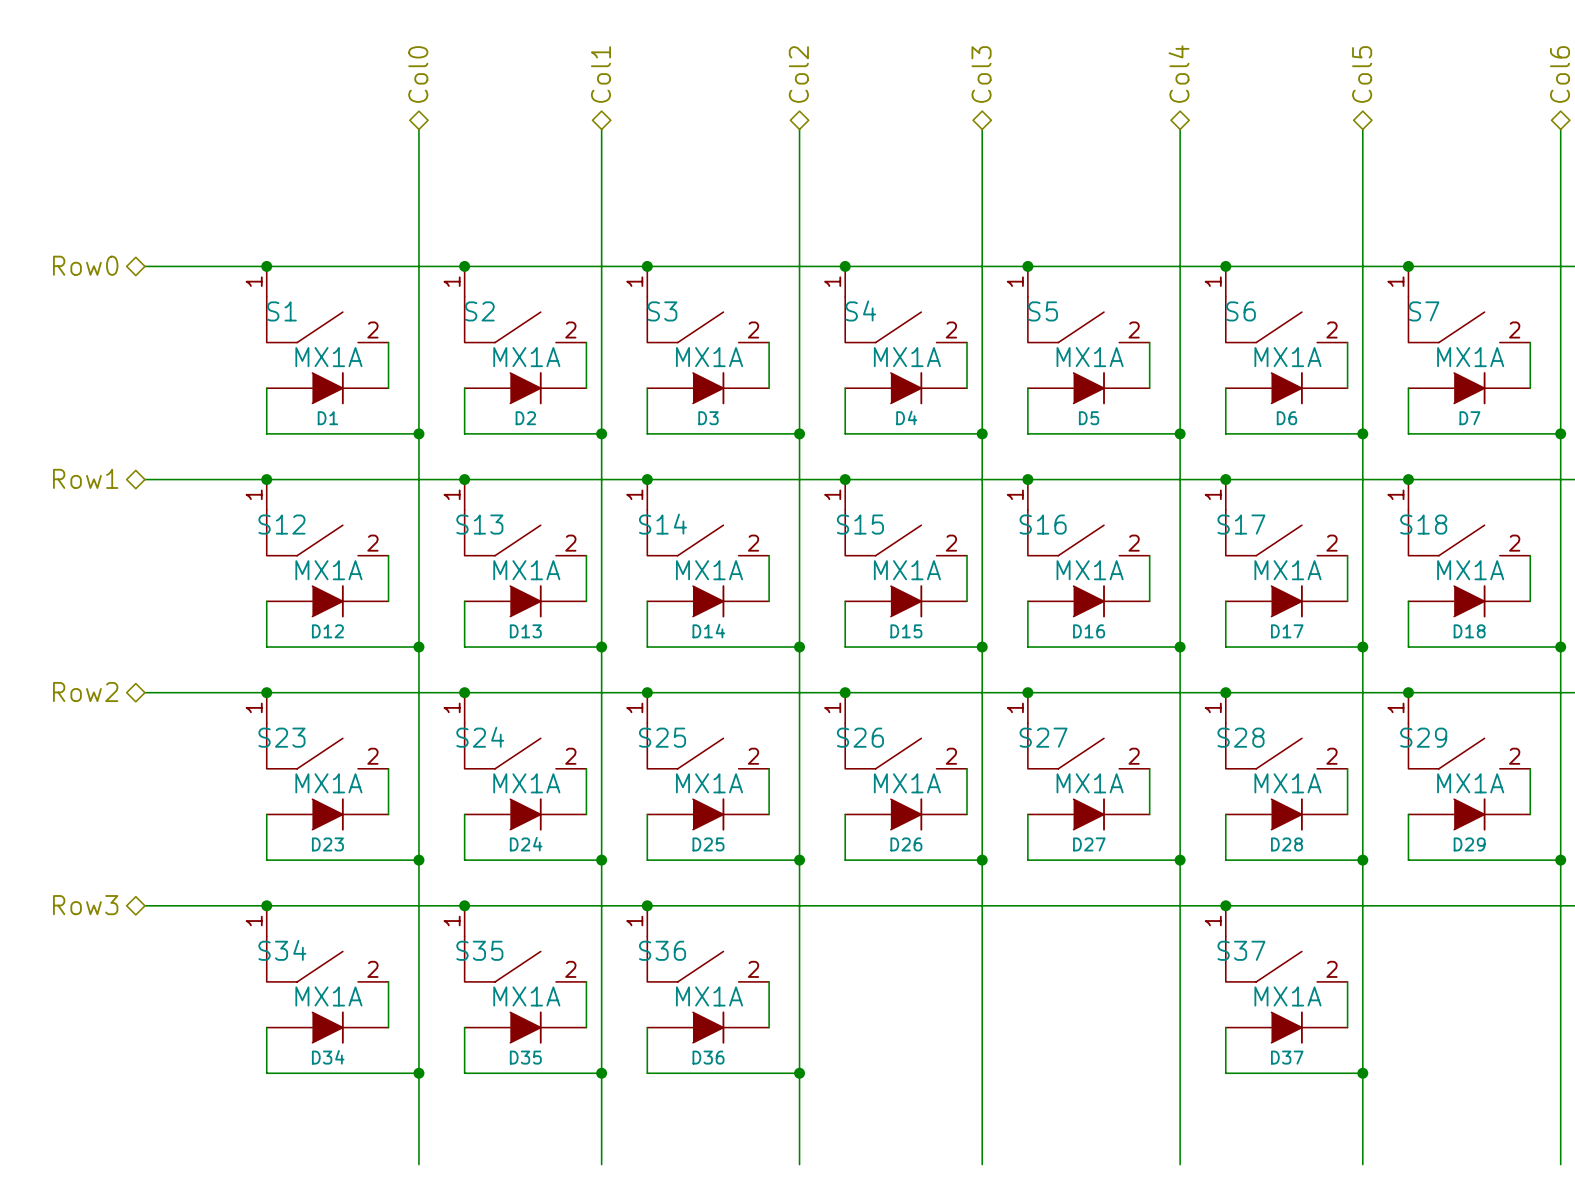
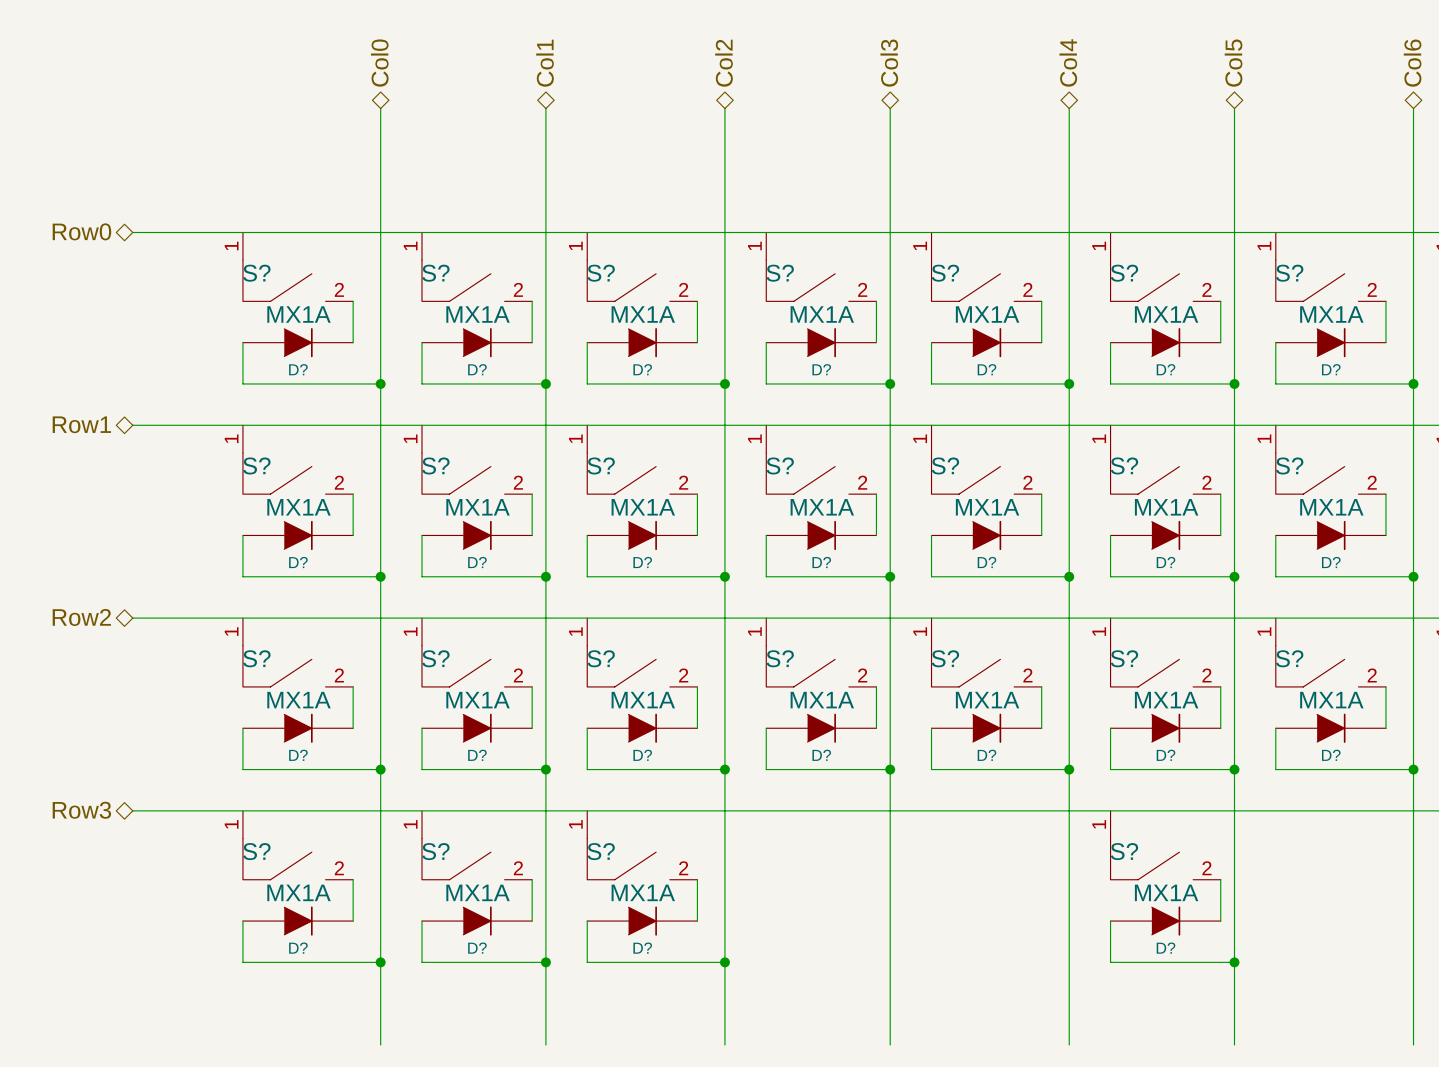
junction: (266, 266) -> none
junction: (464, 266) -> none
junction: (647, 266) -> none
junction: (845, 266) -> none
junction: (1027, 266) -> none
junction: (1225, 266) -> none
junction: (1408, 266) -> none
S4 name: S4 (860, 310) -> S? (780, 273)
S1 name: S1 (281, 311) -> S? (256, 273)
S2 name: S2 (479, 311) -> S? (435, 273)
S3 name: S3 (662, 311) -> S? (601, 273)
S5 name: S5 (1043, 311) -> S? (945, 273)
S6 name: S6 (1241, 311) -> S? (1124, 273)
S7 name: S7 (1424, 311) -> S? (1289, 273)
D4 name: D4 (906, 417) -> D? (821, 369)
D1 name: D1 (327, 418) -> D? (298, 369)
D2 name: D2 (525, 418) -> D? (477, 369)
D3 name: D3 (708, 418) -> D? (642, 369)
D5 name: D5 (1089, 418) -> D? (986, 369)
D6 name: D6 (1286, 418) -> D? (1166, 369)
D7 name: D7 (1469, 418) -> D? (1331, 369)
junction: (266, 479) -> none
junction: (464, 479) -> none
junction: (647, 479) -> none
junction: (845, 479) -> none
junction: (1027, 479) -> none
junction: (1225, 479) -> none
junction: (1408, 479) -> none
S12 name: S12 (281, 524) -> S? (256, 465)
S13 name: S13 (479, 524) -> S? (435, 465)
S14 name: S14 (662, 524) -> S? (601, 465)
S15 name: S15 (860, 524) -> S? (780, 465)
S16 name: S16 (1043, 524) -> S? (945, 465)
S17 name: S17 (1241, 524) -> S? (1124, 465)
S18 name: S18 (1423, 524) -> S? (1289, 465)
D12 name: D12 (327, 631) -> D? (298, 562)
D13 name: D13 (525, 631) -> D? (477, 562)
D14 name: D14 (708, 631) -> D? (642, 562)
D15 name: D15 (906, 631) -> D? (821, 562)
D16 name: D16 (1089, 631) -> D? (986, 562)
D17 name: D17 (1287, 631) -> D? (1166, 562)
D18 name: D18 (1469, 631) -> D? (1331, 562)
junction: (266, 692) -> none
junction: (464, 692) -> none
junction: (647, 692) -> none
junction: (845, 692) -> none
junction: (1027, 692) -> none
junction: (1225, 692) -> none
junction: (1408, 692) -> none
S23 name: S23 (281, 737) -> S? (256, 658)
S24 name: S24 (480, 737) -> S? (435, 658)
S25 name: S25 (662, 737) -> S? (601, 658)
S26 name: S26 (860, 737) -> S? (780, 658)
S27 name: S27 (1043, 737) -> S? (945, 658)
S28 name: S28 (1241, 737) -> S? (1124, 658)
S29 name: S29 (1423, 737) -> S? (1289, 658)
D23 name: D23 (327, 844) -> D? (298, 755)
D24 name: D24 (526, 844) -> D? (477, 755)
D25 name: D25 (708, 844) -> D? (642, 755)
D26 name: D26 (906, 844) -> D? (821, 755)
D27 name: D27 (1089, 844) -> D? (986, 755)
D28 name: D28 (1286, 844) -> D? (1166, 755)
D29 name: D29 (1469, 844) -> D? (1331, 755)
junction: (266, 905) -> none
junction: (464, 905) -> none
junction: (647, 905) -> none
junction: (1225, 905) -> none
S34 name: S34 (282, 950) -> S? (256, 851)
S35 name: S35 (479, 950) -> S? (435, 851)
S36 name: S36 (662, 950) -> S? (601, 851)
S37 name: S37 (1241, 950) -> S? (1124, 851)
D34 name: D34 (328, 1057) -> D? (298, 948)
D35 name: D35 (525, 1057) -> D? (477, 948)
D36 name: D36 (708, 1057) -> D? (642, 948)
D37 name: D37 (1287, 1057) -> D? (1166, 948)

